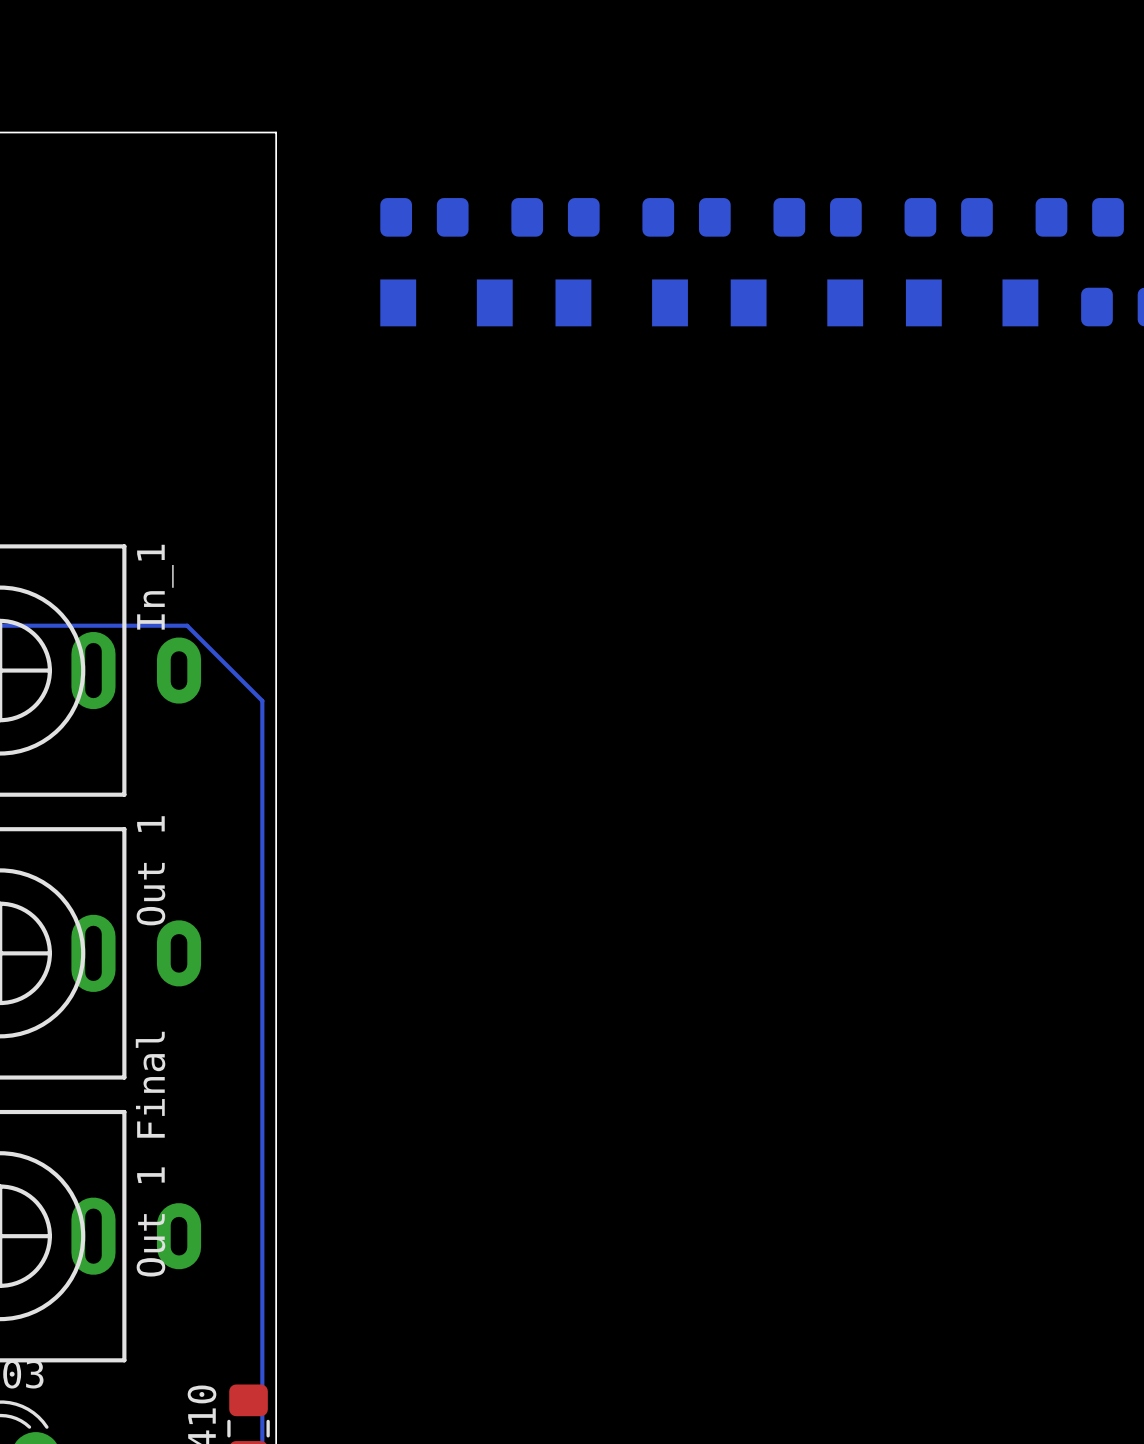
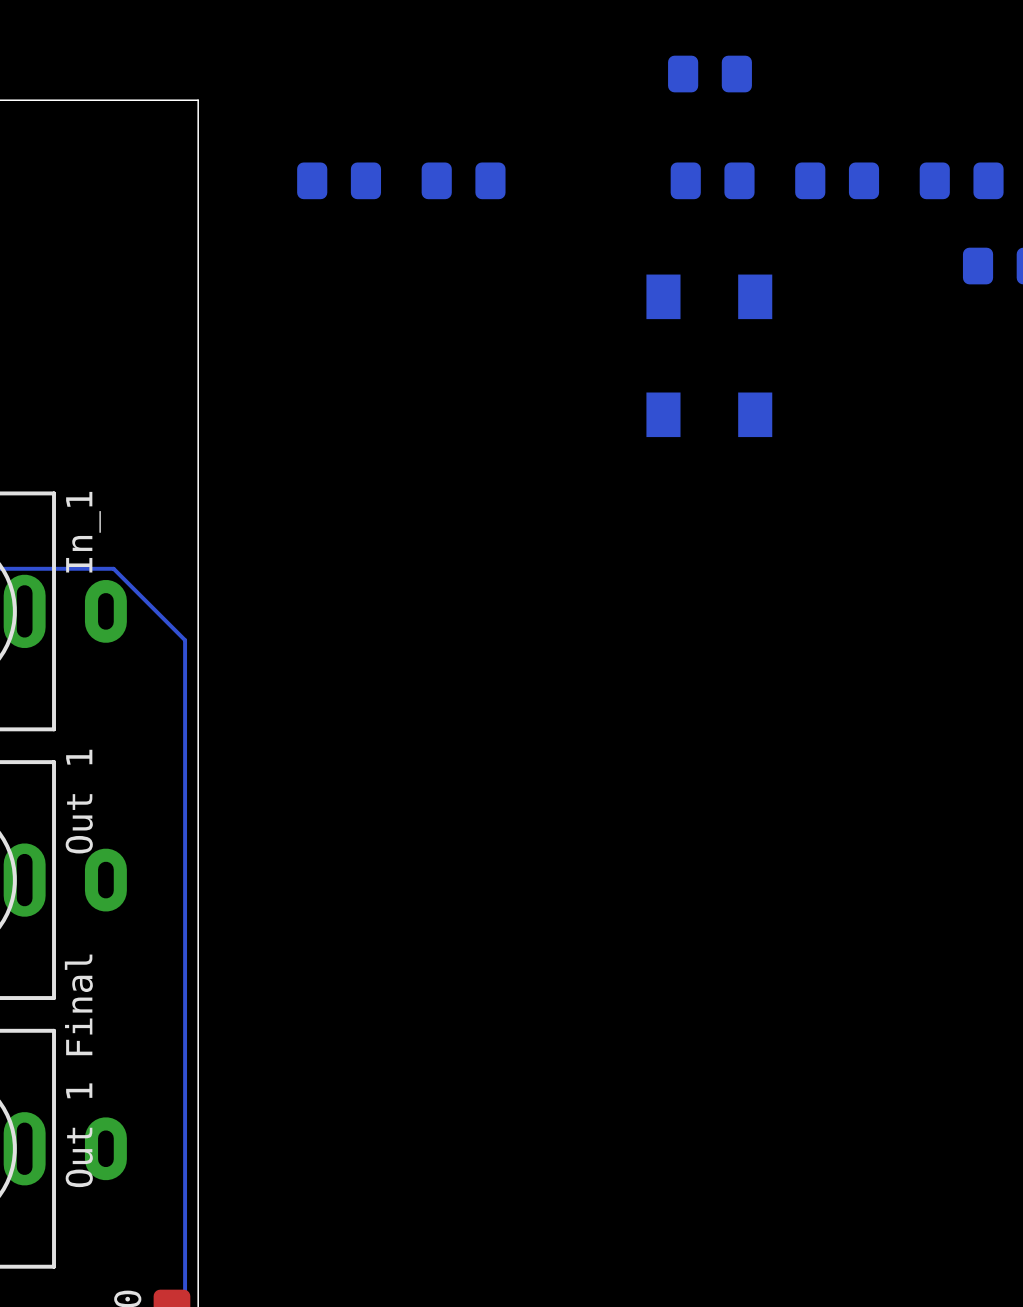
part position: (686, 217) -> (710, 74)
part: (446, 302) -> none
part: (621, 302) -> none
part position: (796, 302) -> (709, 296)
part: (972, 302) -> none
part: none -> (709, 414)

